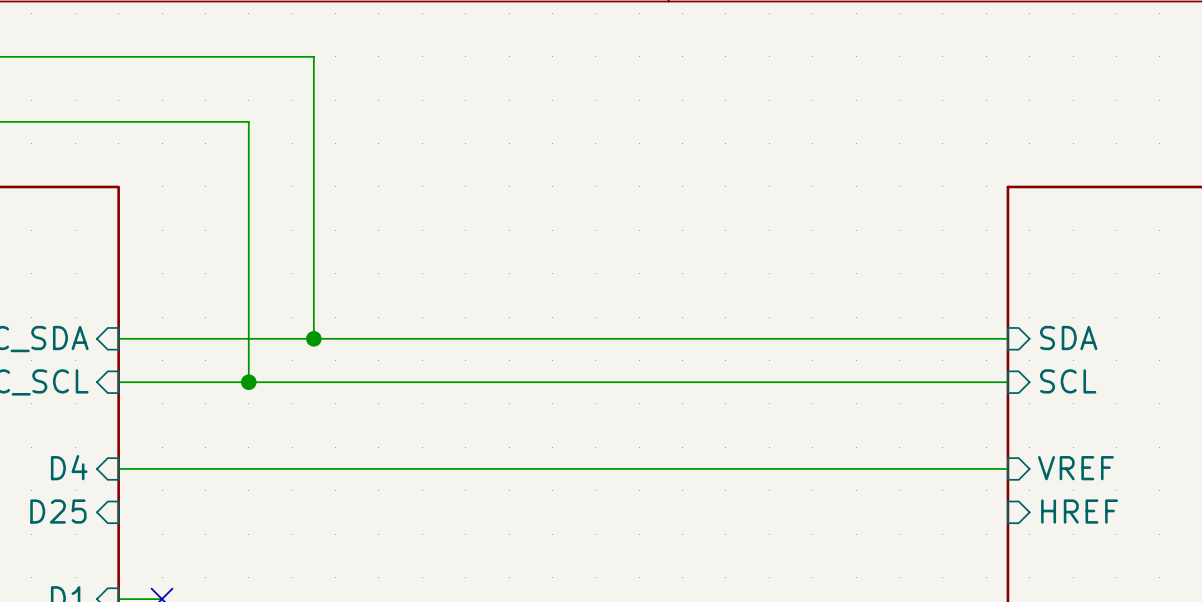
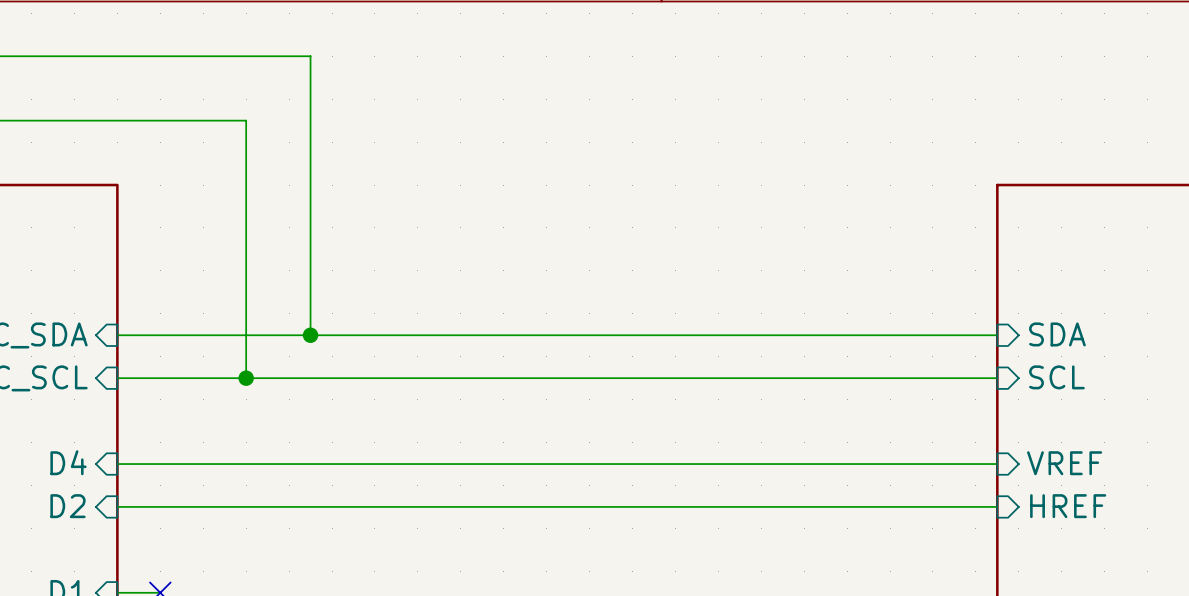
sheet pin: D25 (58, 511) -> D2 (67, 506)
wire: none -> (117, 506) (997, 506)

